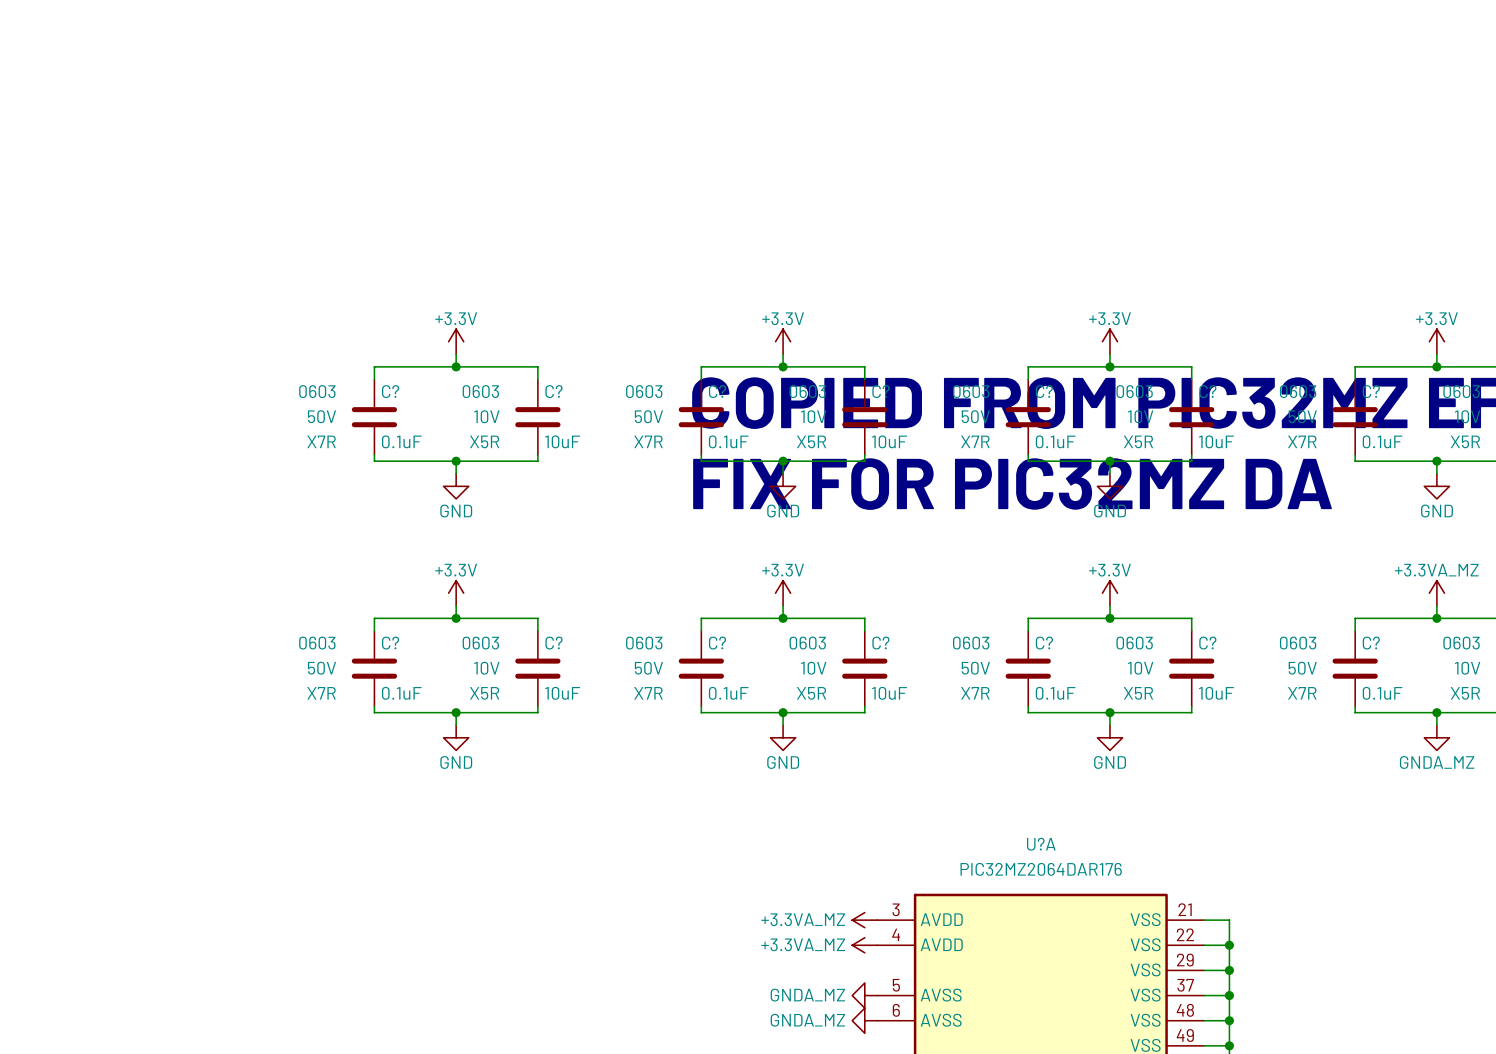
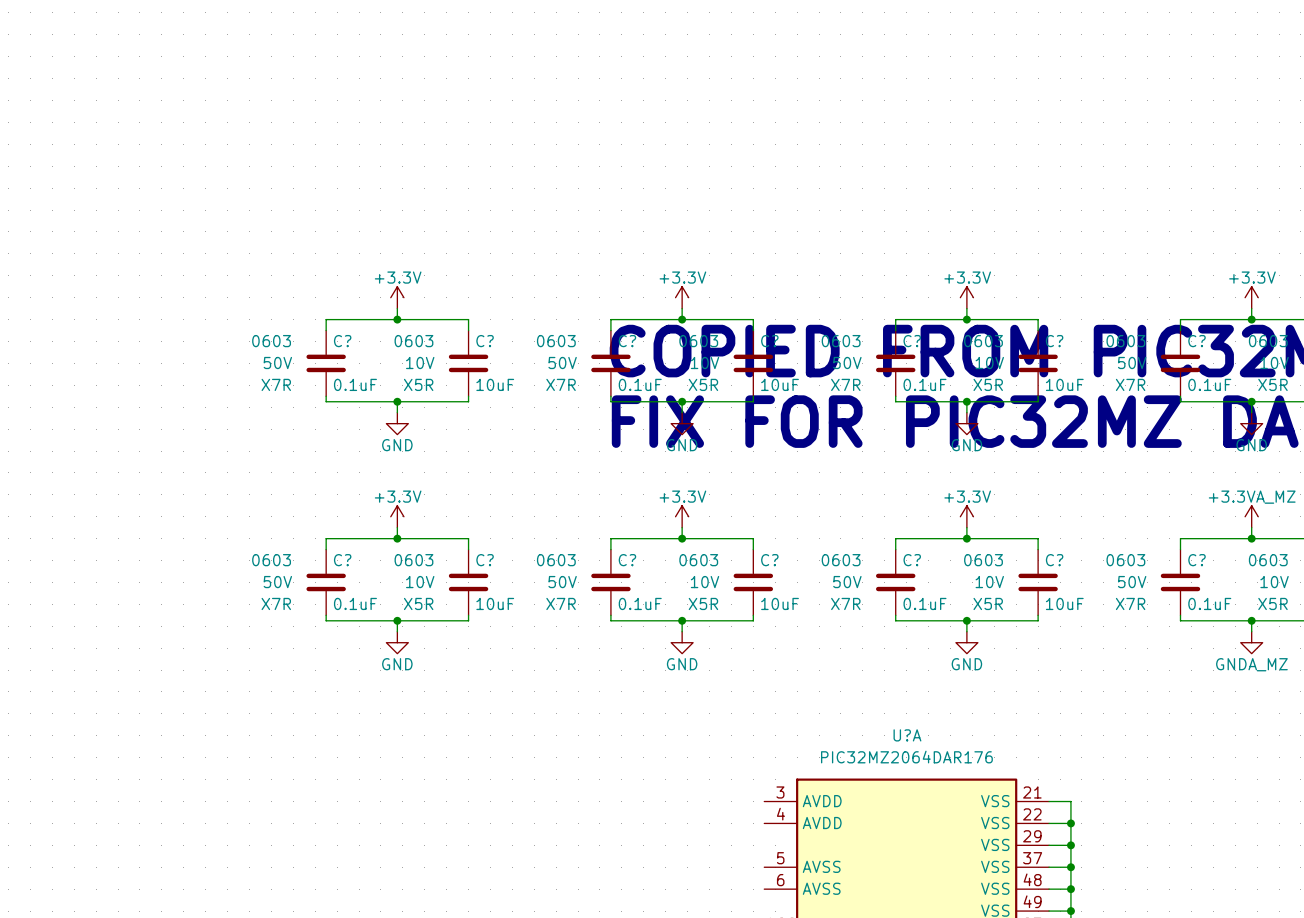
power symbol: +3.3VA_MZ (864, 920) -> none
power symbol: +3.3VA_MZ (864, 945) -> none
power symbol: GNDA_MZ (864, 995) -> none
power symbol: GNDA_MZ (864, 1020) -> none

